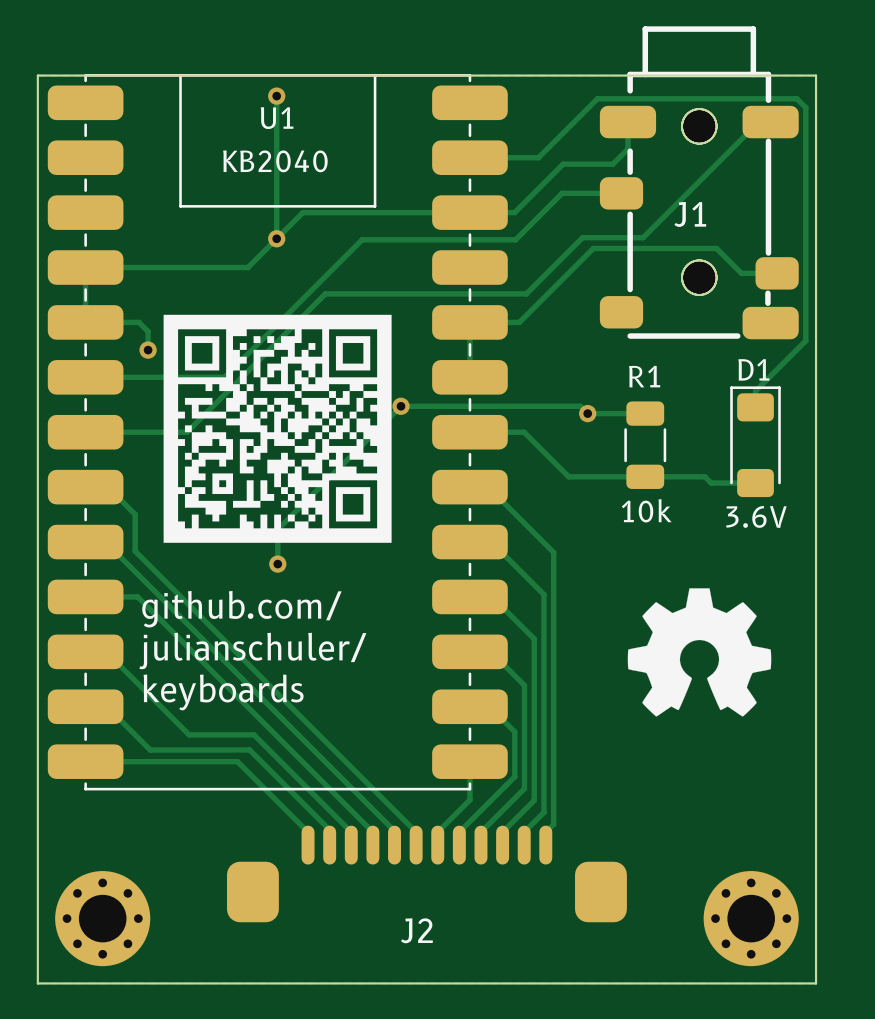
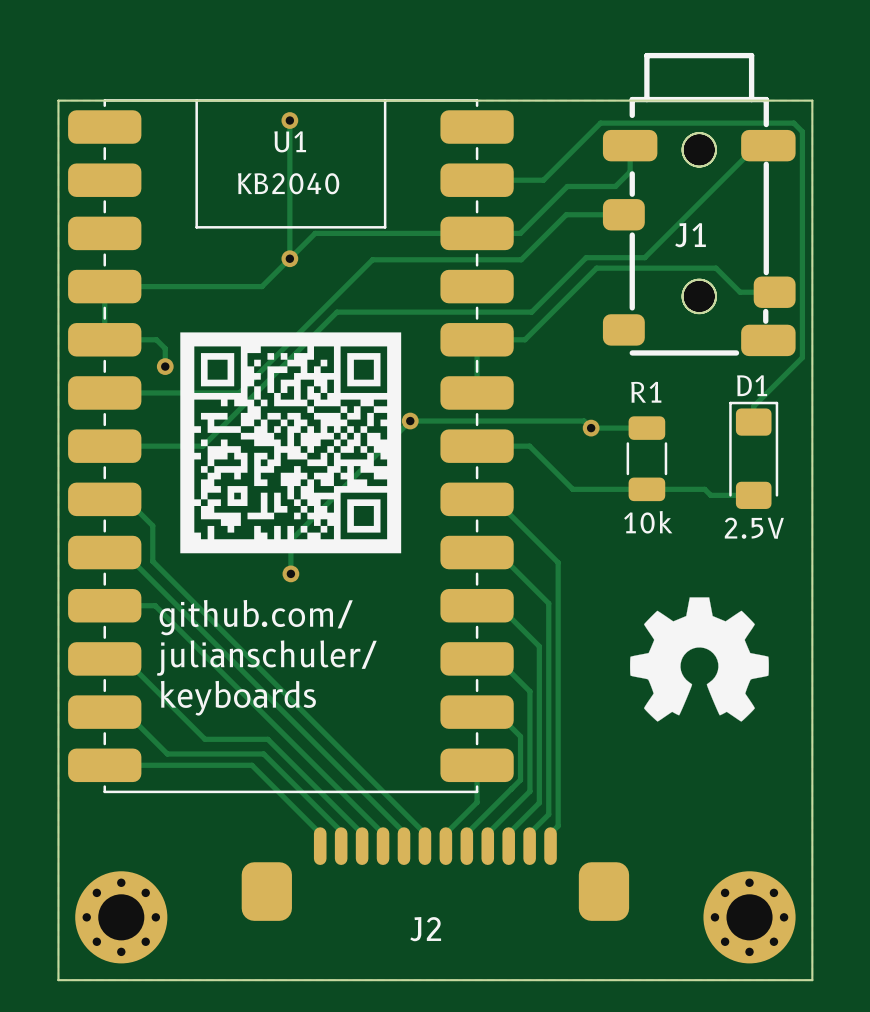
D1 value: 3.6V (756, 516) -> 2.5V (754, 528)

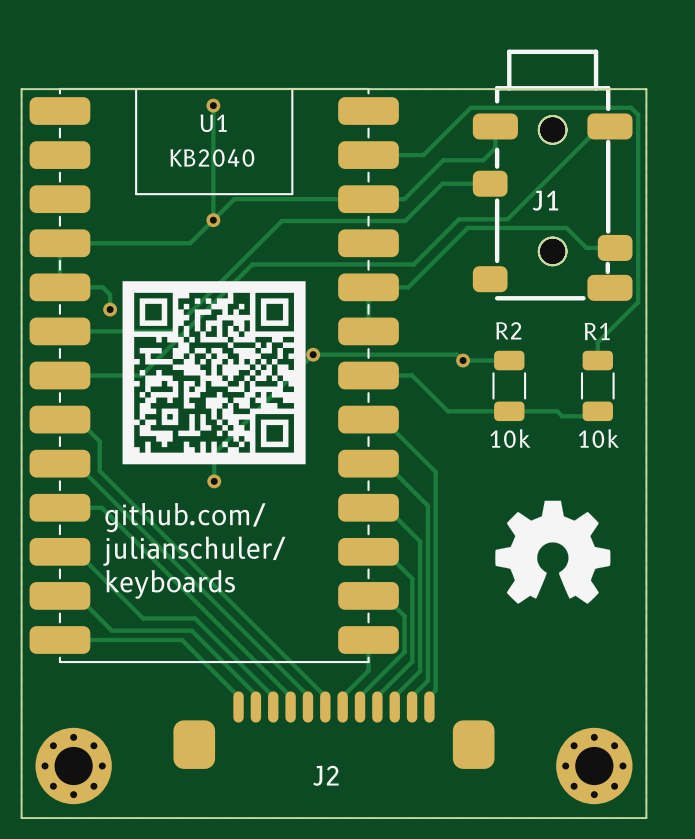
R1 name: R1 (646, 392) -> R2 (508, 330)
D1: 2.5V (753, 455) -> none
R1: none -> 10k (597, 385)

